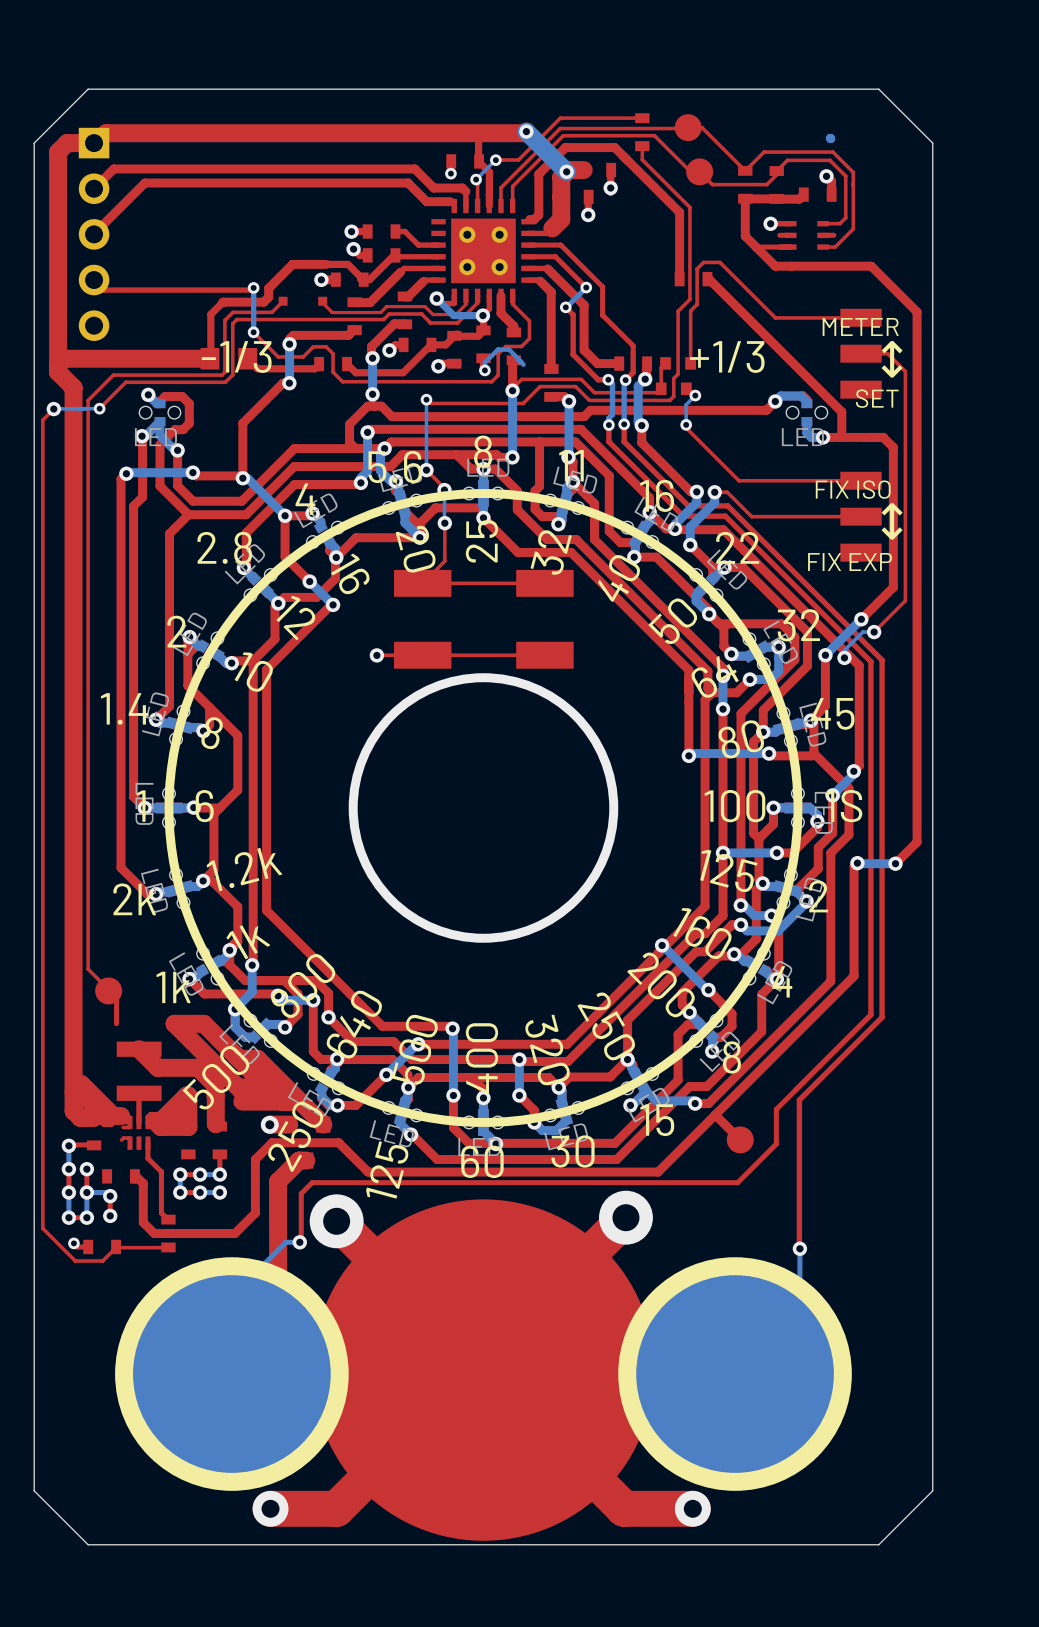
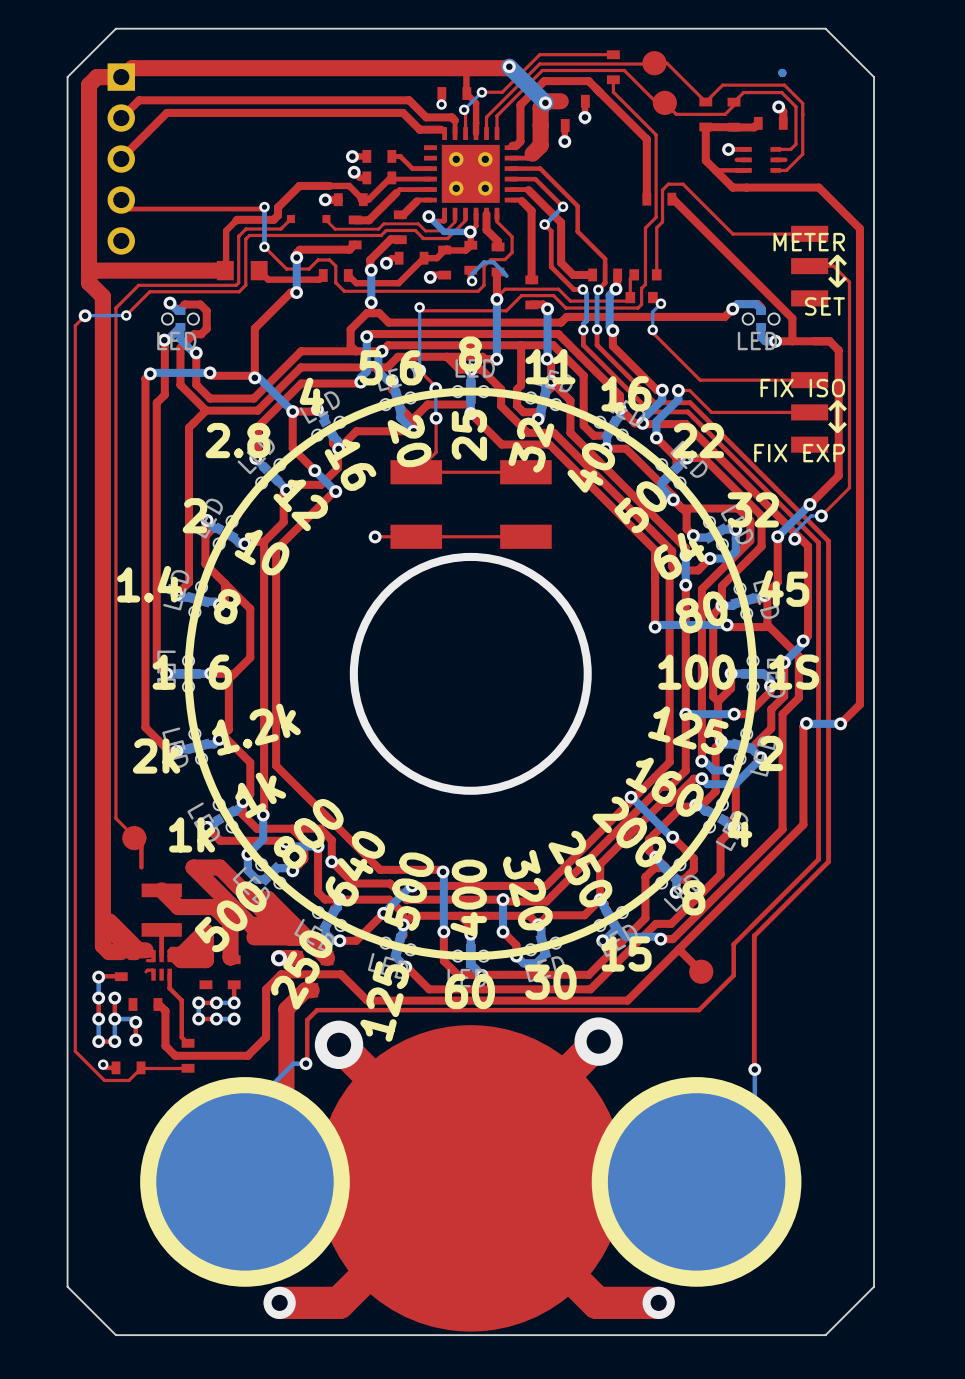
text: -1/3 (236, 357) -> none
text: +1/3 (727, 357) -> none

